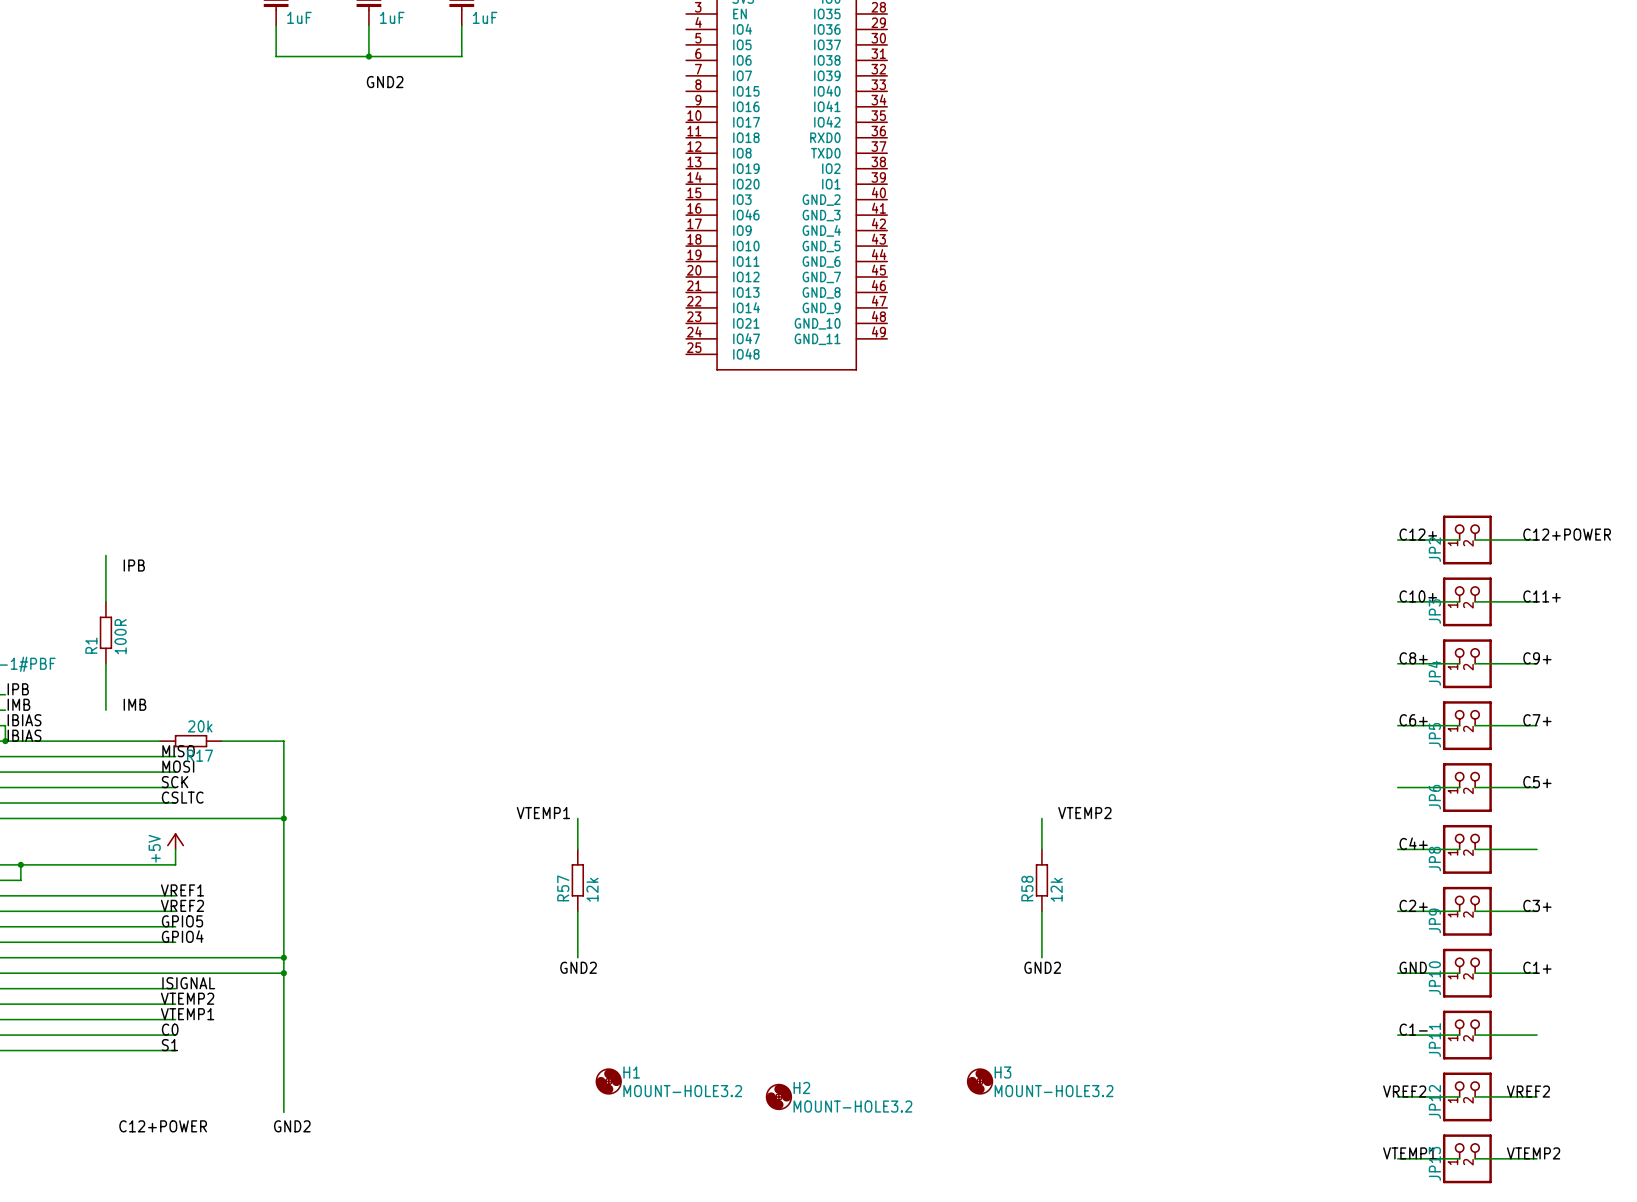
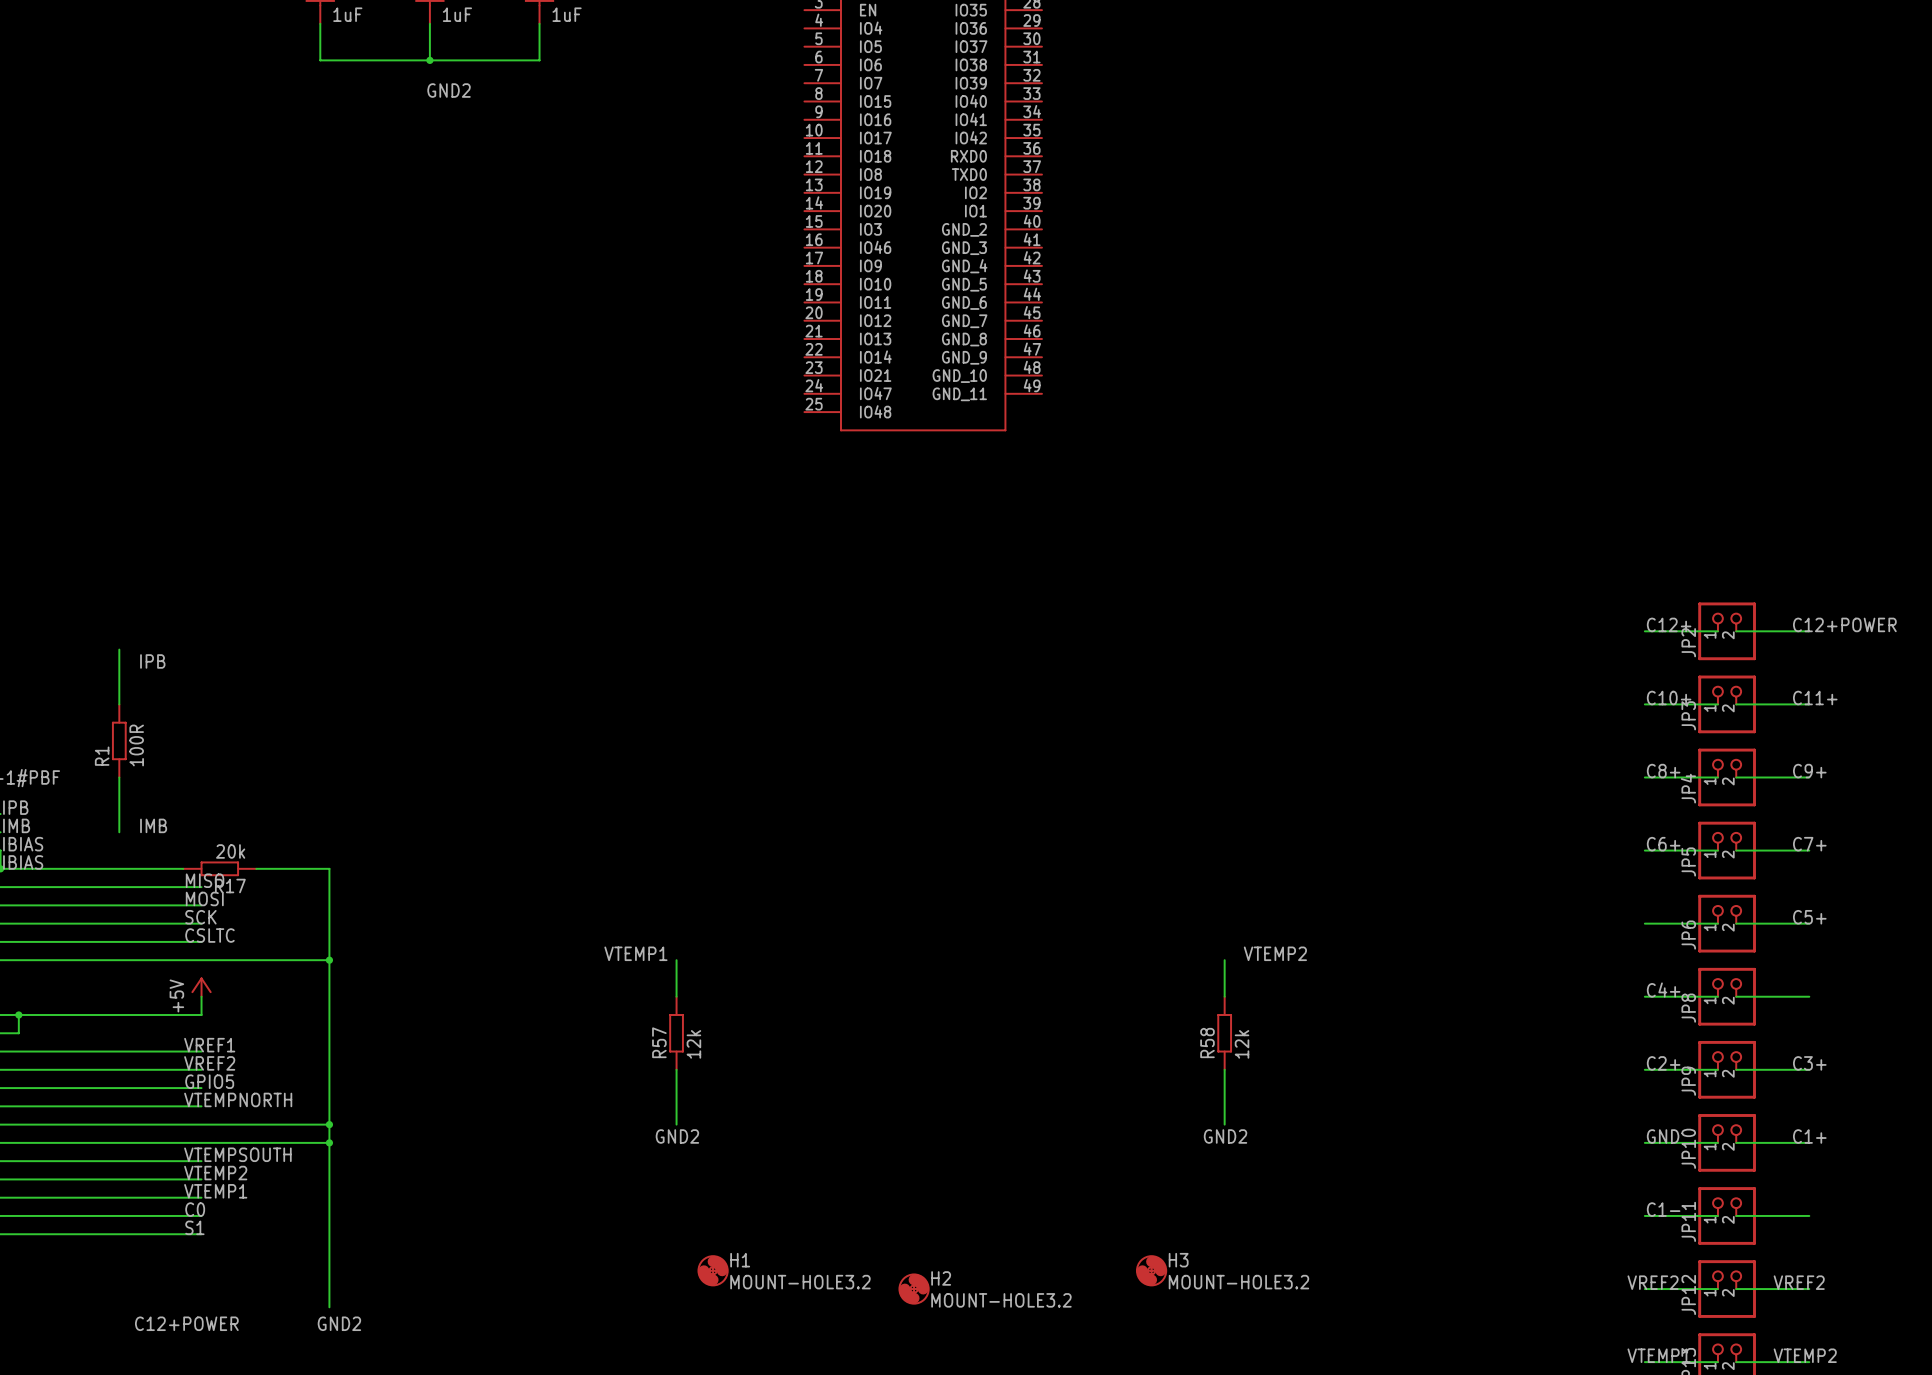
label: GPIO4 (182, 936) -> VTEMPNORTH (238, 1099)
label: ISIGNAL (188, 983) -> VTEMPSOUTH (237, 1154)

